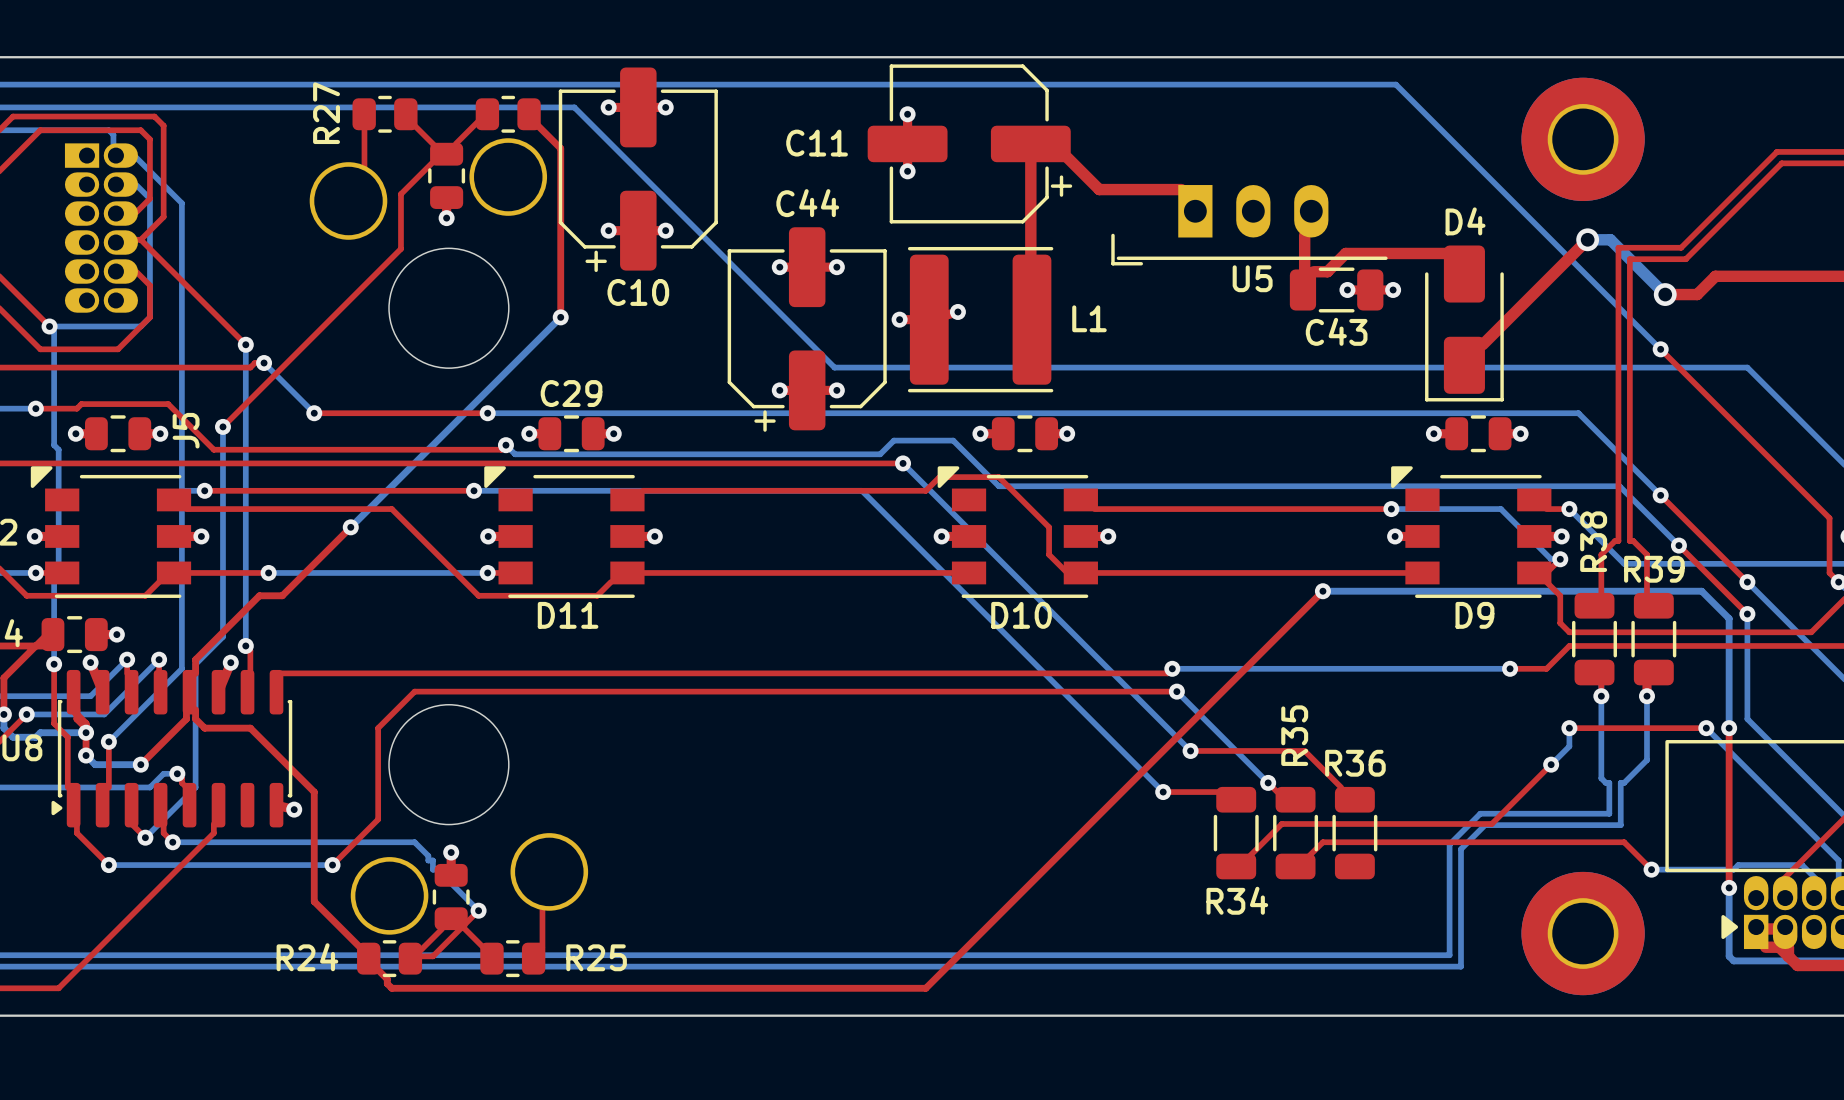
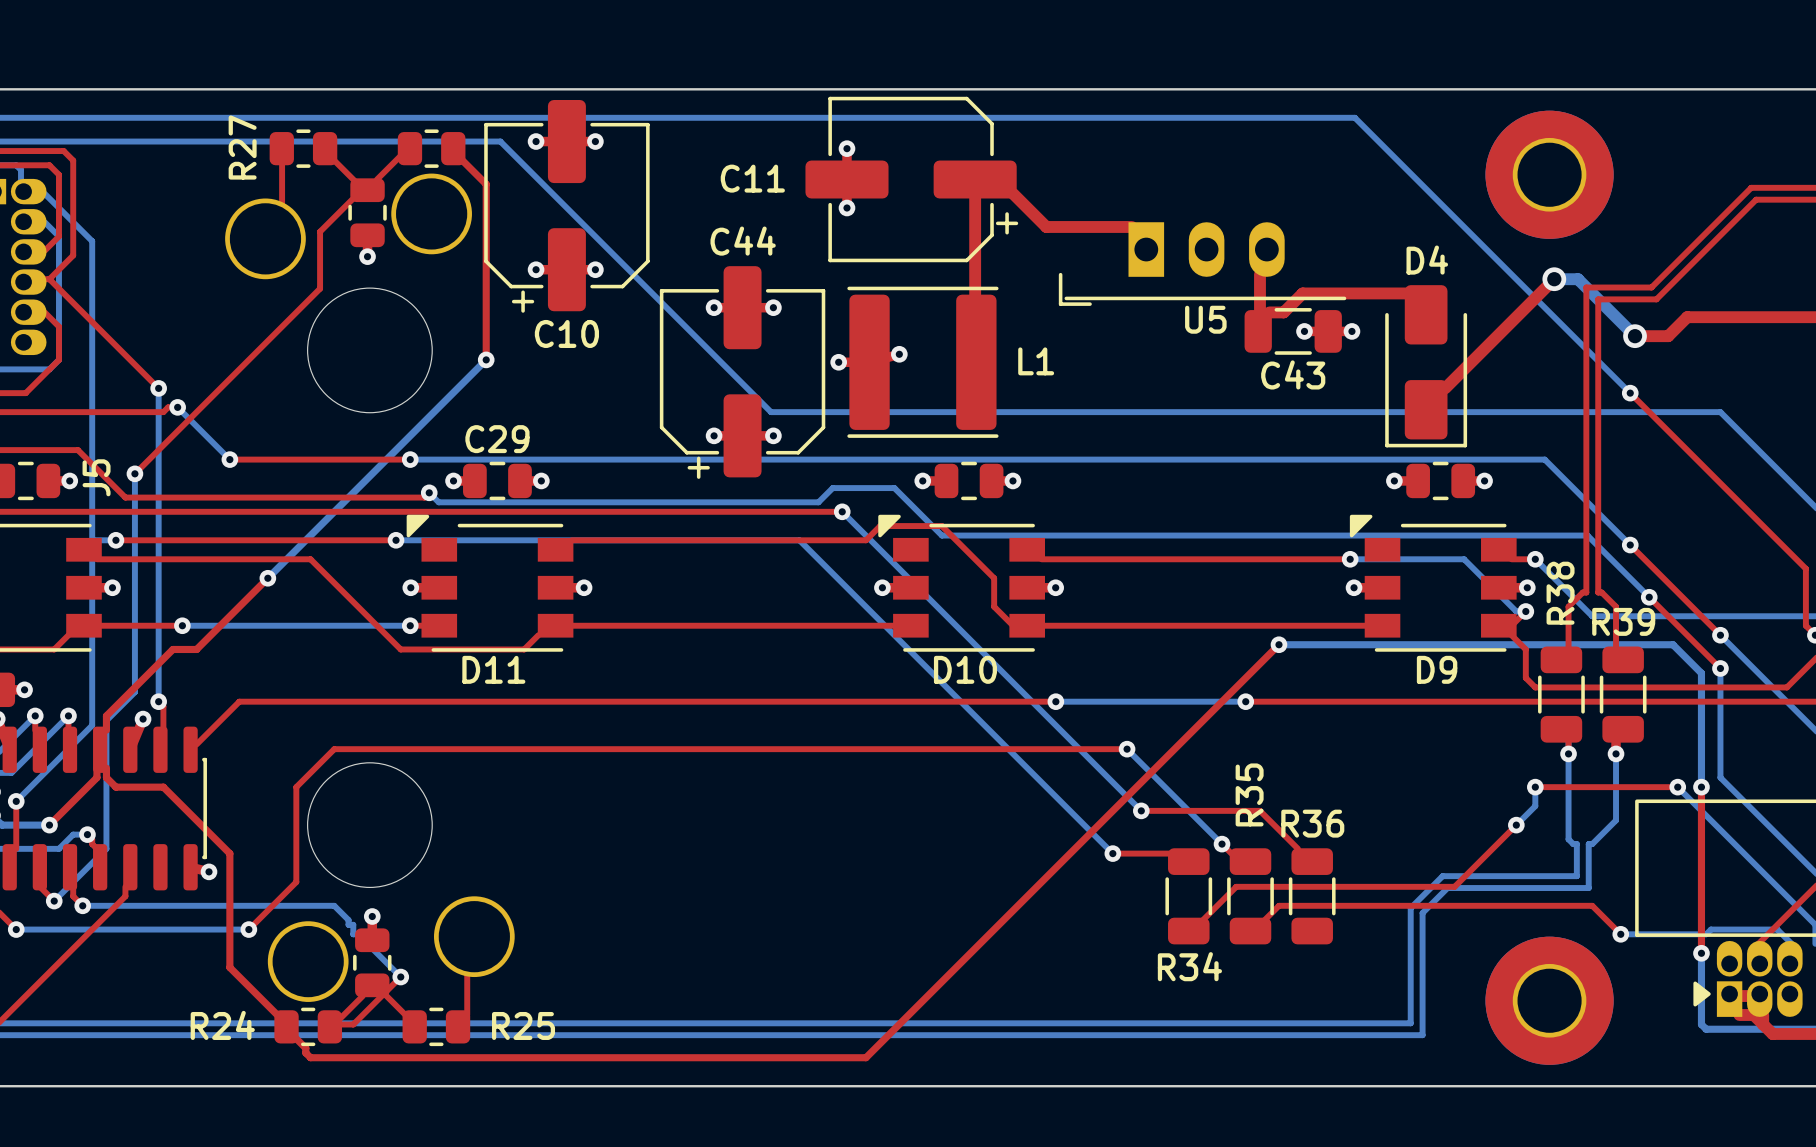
top track: none -> (1055, 701) (239, 701) (196, 744)
bottom track: none -> (1055, 701) (1245, 701)
via: none -> (1055, 701)
via: none -> (1245, 701)
top track: (1569, 645) (1546, 668) (1510, 668) -> (1535, 701) (1245, 701)
top track: (1172, 668) (1167, 673) (282, 673) -> none
bottom track: (1172, 668) (1510, 668) -> none
via: (1172, 668) -> none
via: (1510, 668) -> none

